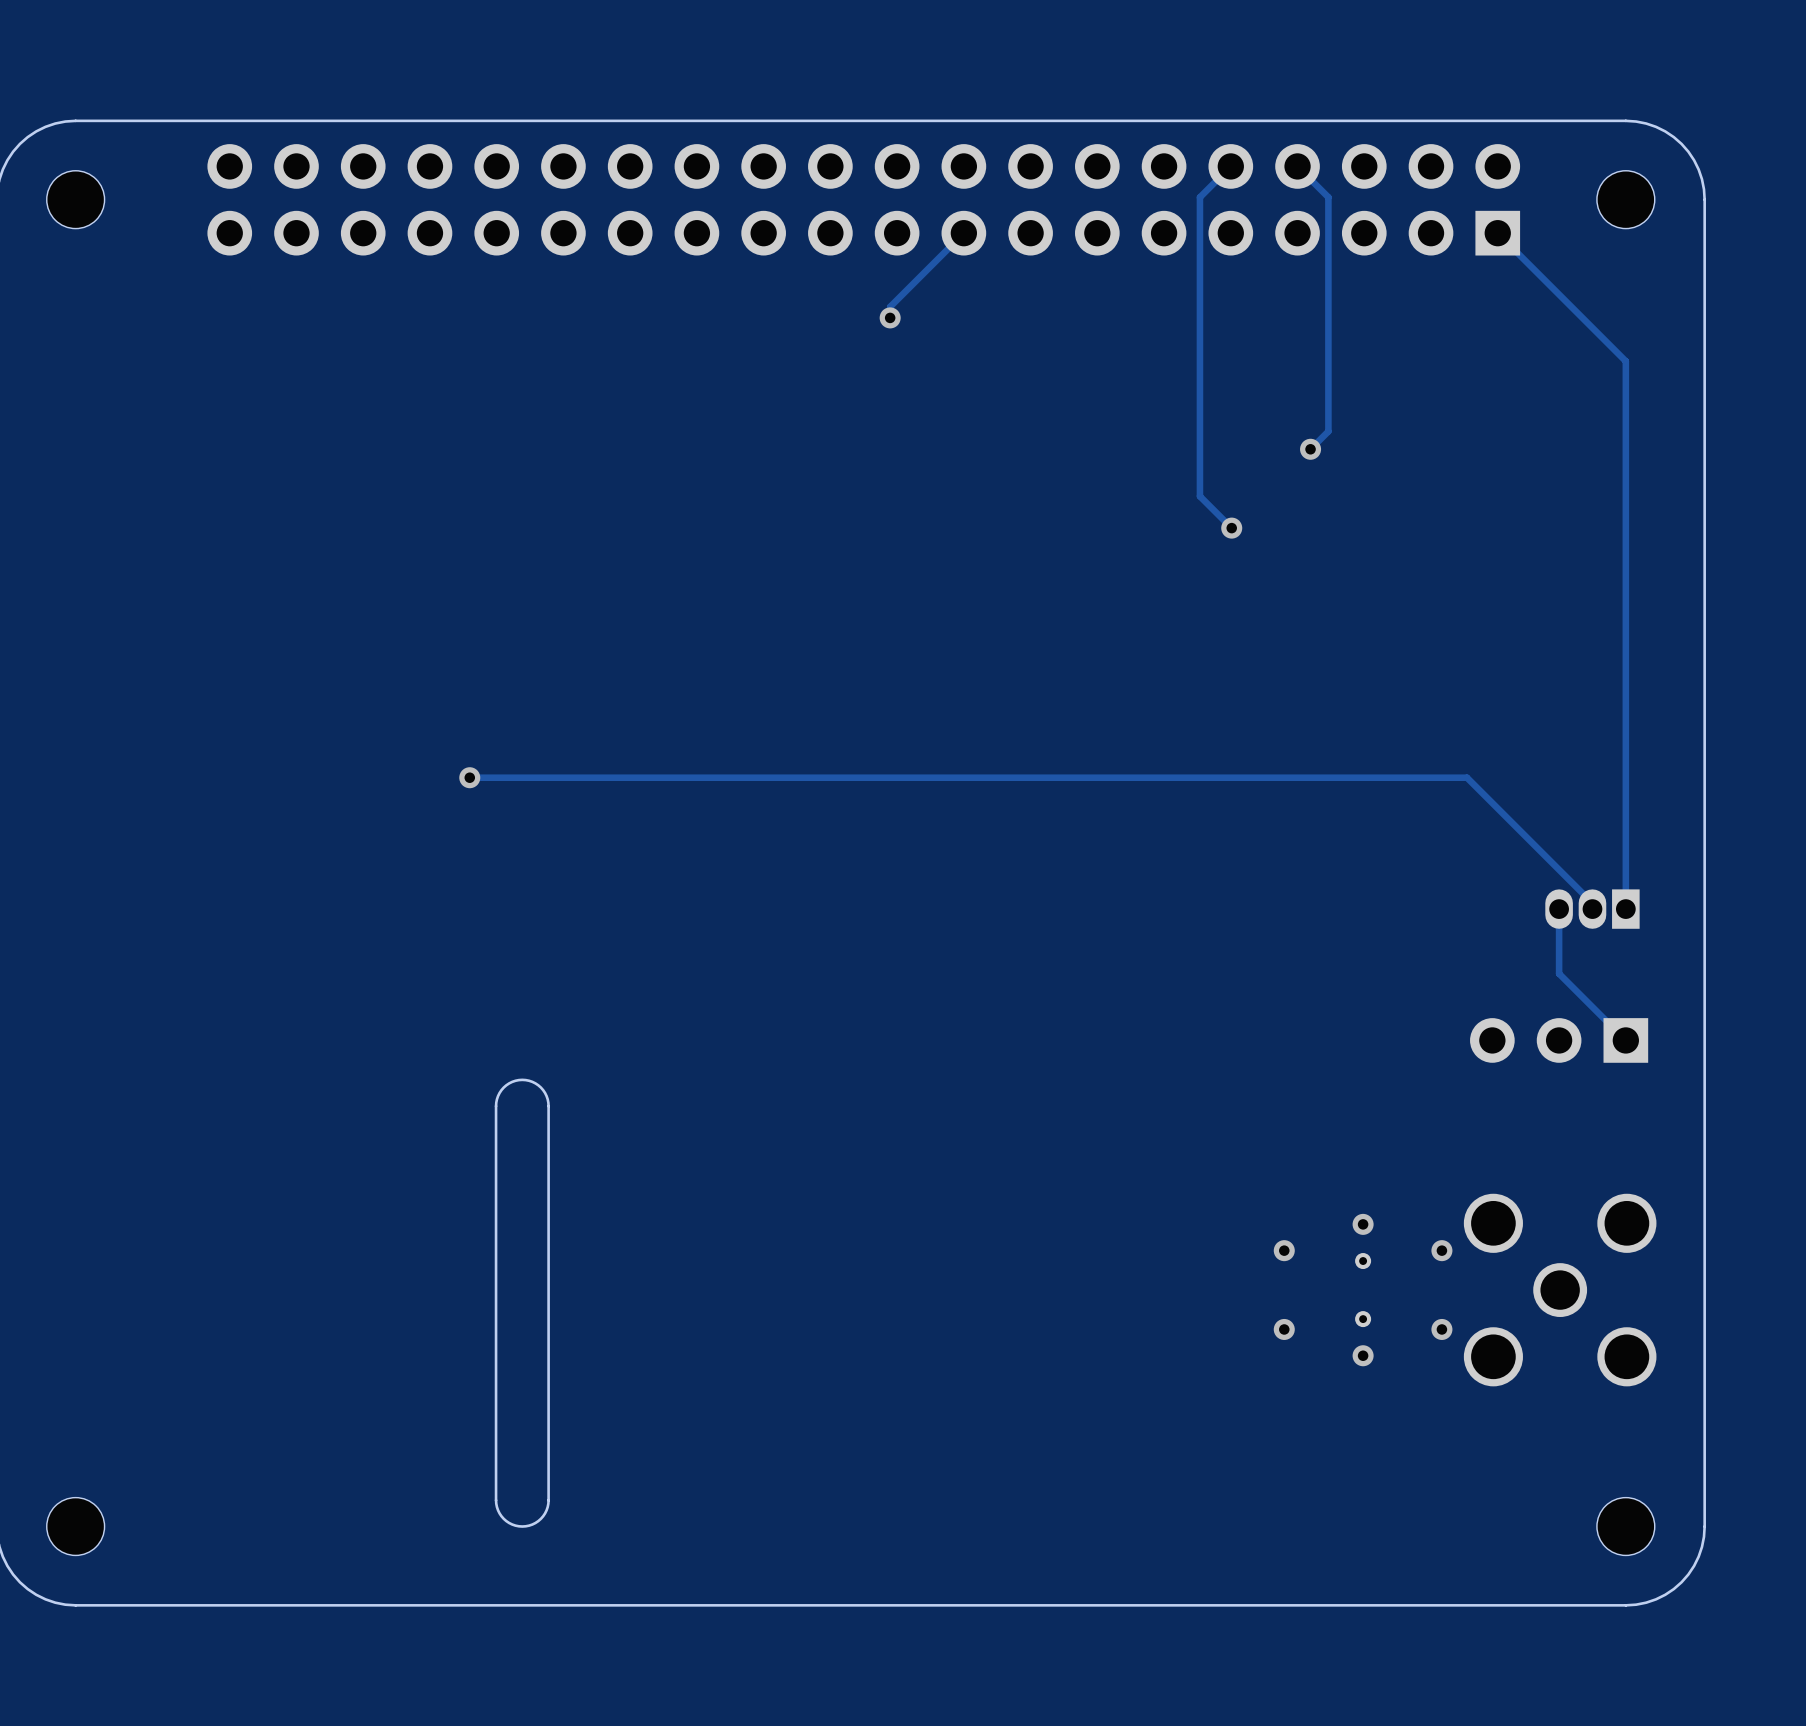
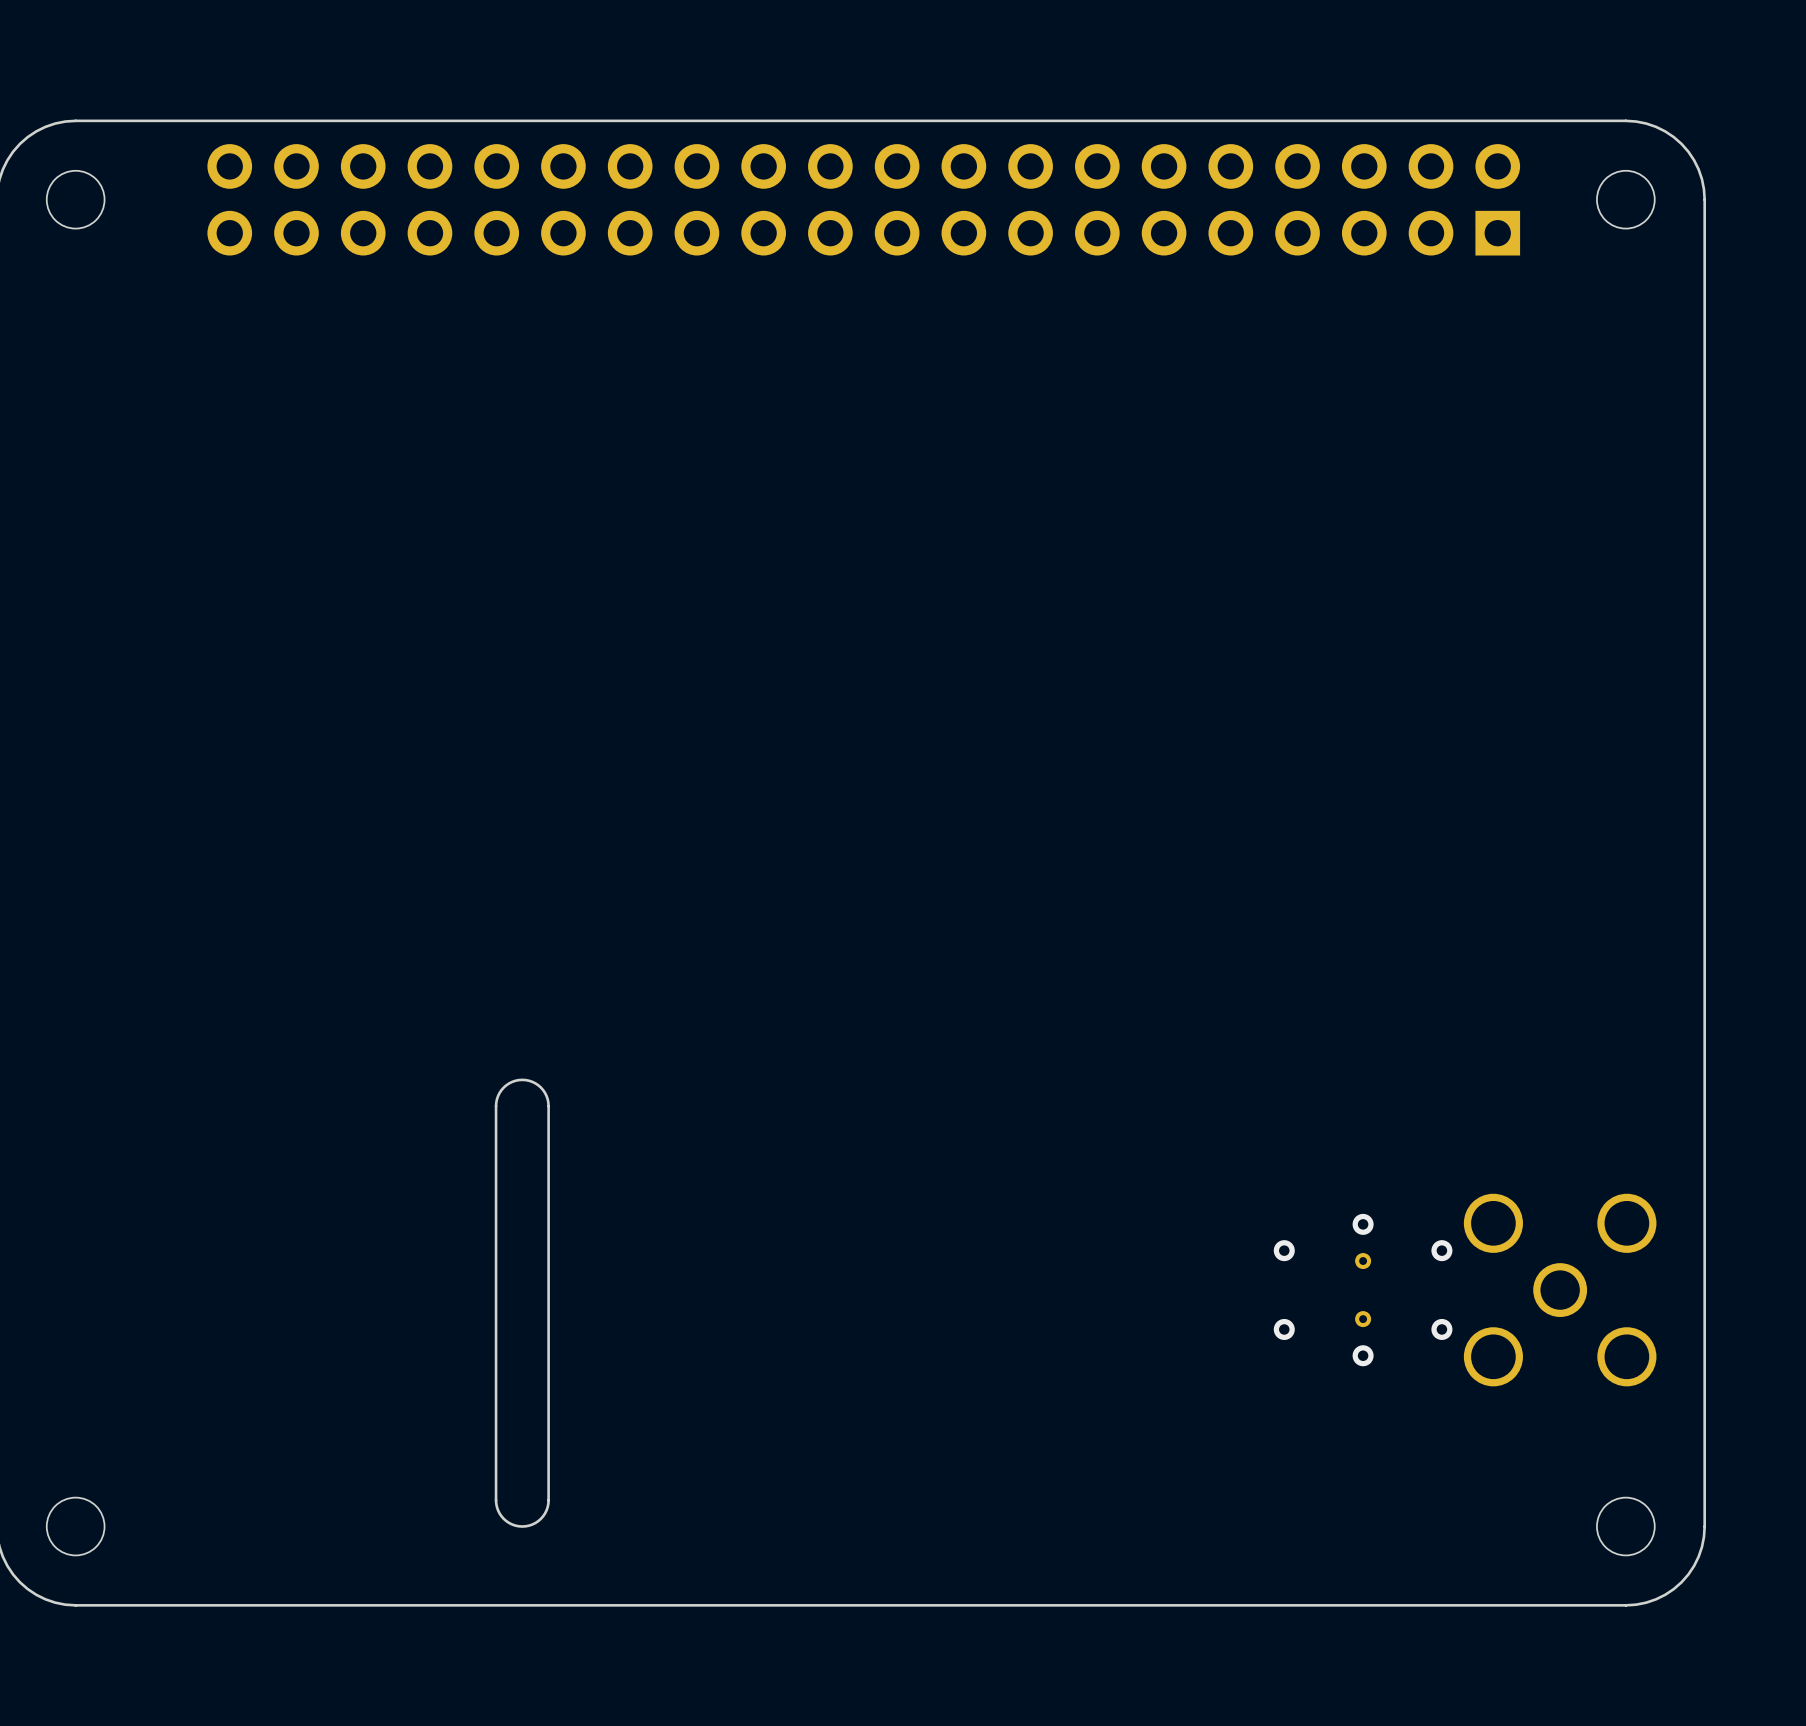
track: (1230, 166) (1199, 197) (1199, 496) (1231, 528) -> none
track: (1297, 166) (1328, 197) (1328, 431) (1310, 449) -> none
track: (963, 233) (890, 306) (890, 317) -> none
track: (1497, 233) (1625, 361) (1625, 909) -> none
via: (890, 317) -> none
via: (1310, 449) -> none
via: (1231, 528) -> none
track: (469, 777) (1467, 777) (1592, 903) (1592, 909) -> none
via: (469, 777) -> none
track: (1559, 909) (1559, 973) (1625, 1040) -> none
part: (1592, 909) -> none
part: (1559, 1040) -> none

